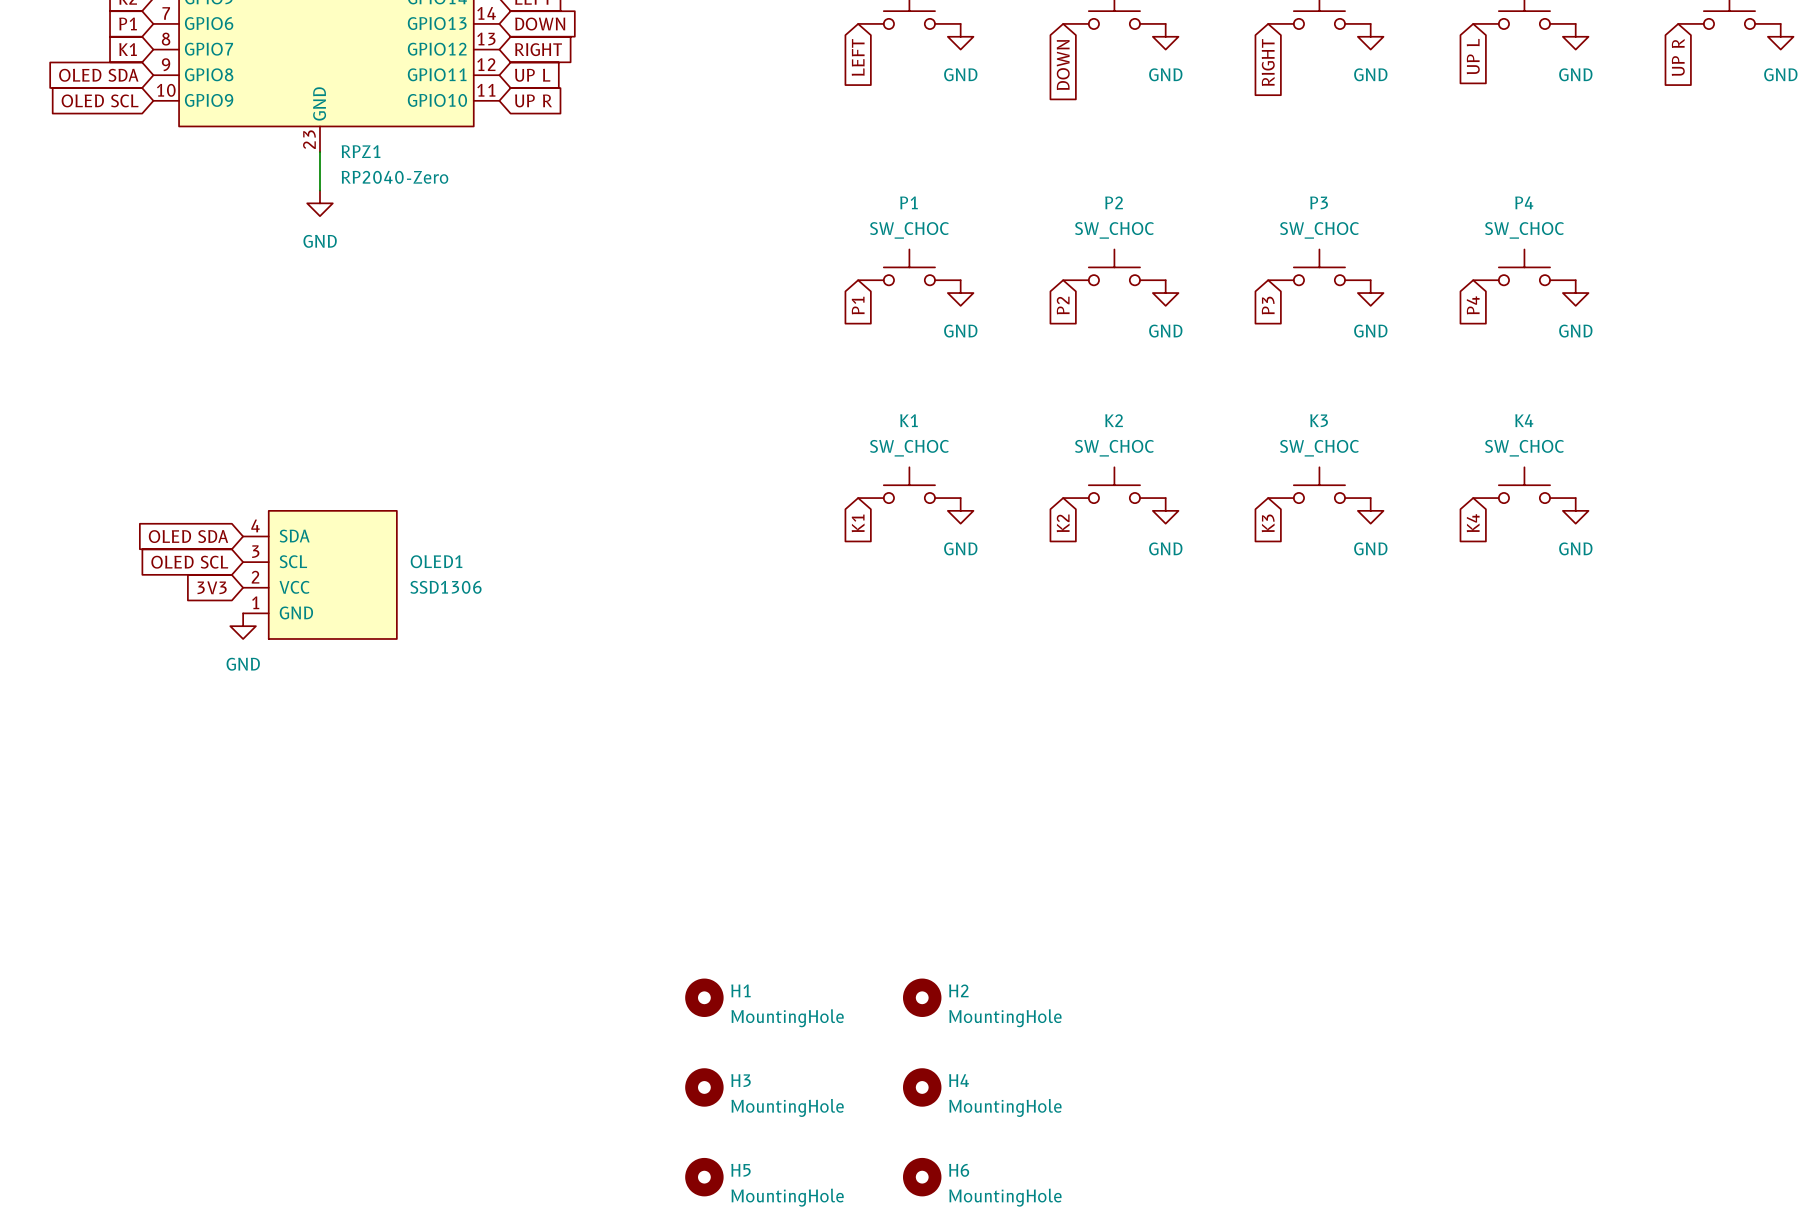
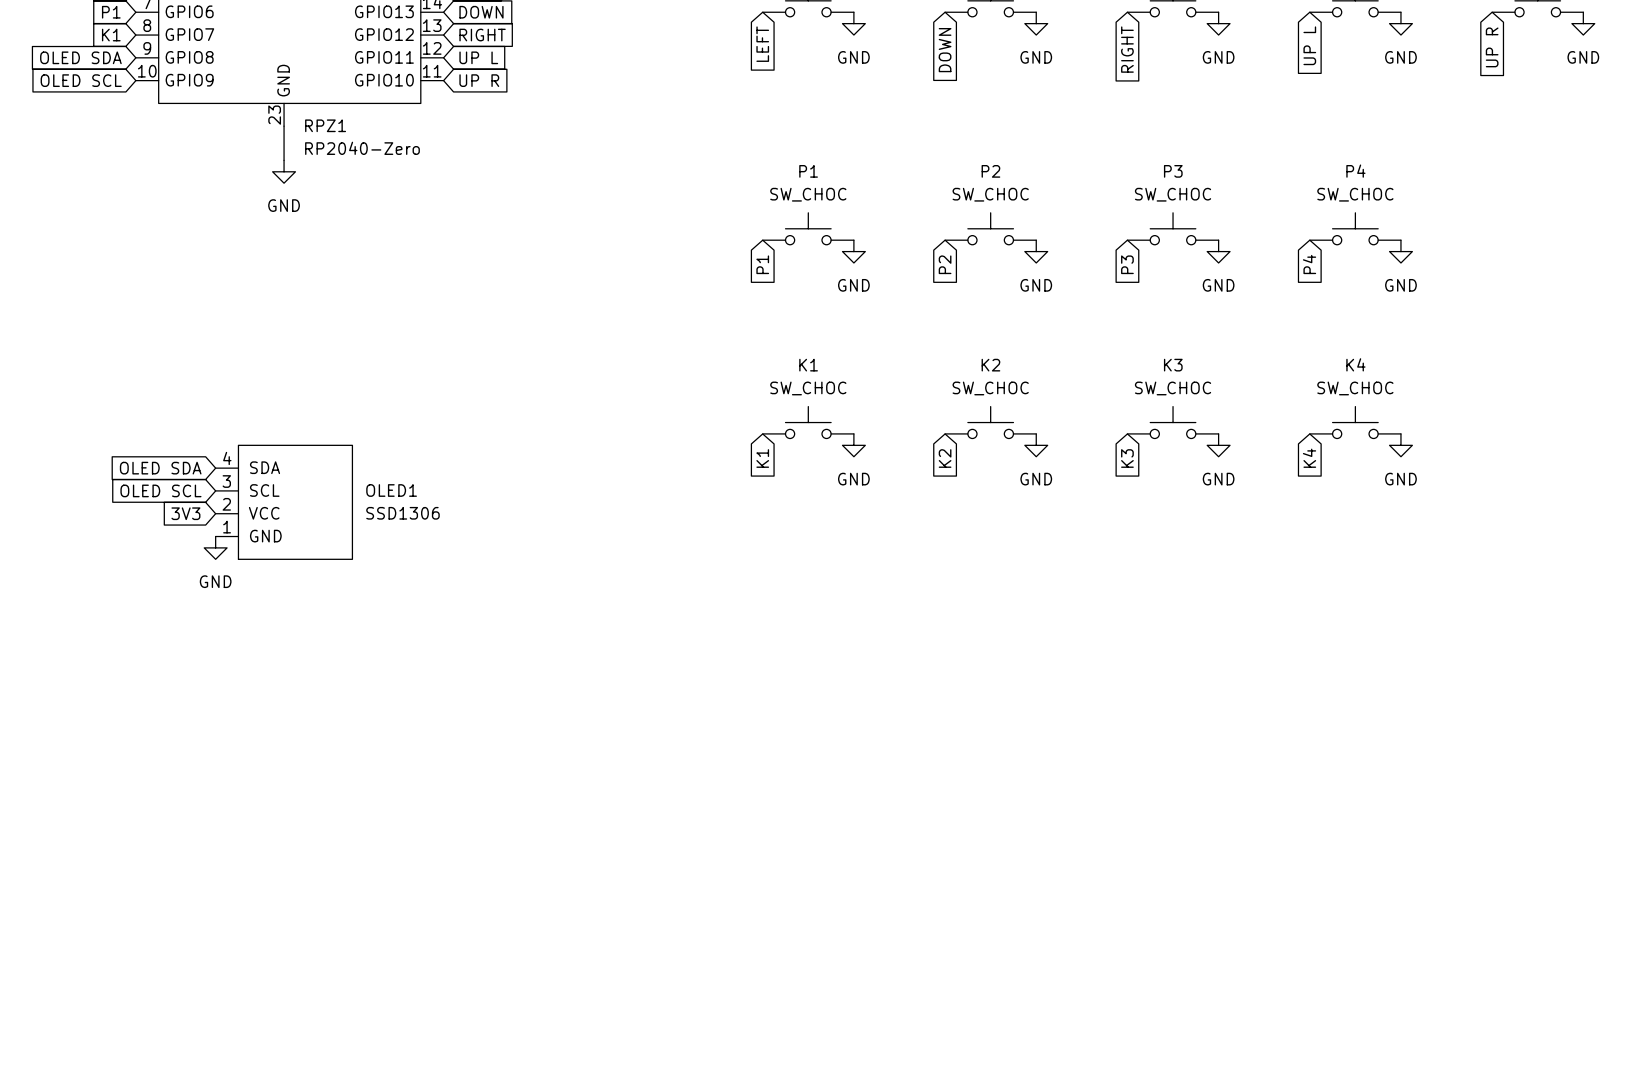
H1: MountingHole (704, 997) -> none
H2: MountingHole (922, 997) -> none
H3: MountingHole (704, 1087) -> none
H4: MountingHole (922, 1087) -> none
H5: MountingHole (704, 1177) -> none
H6: MountingHole (922, 1177) -> none

